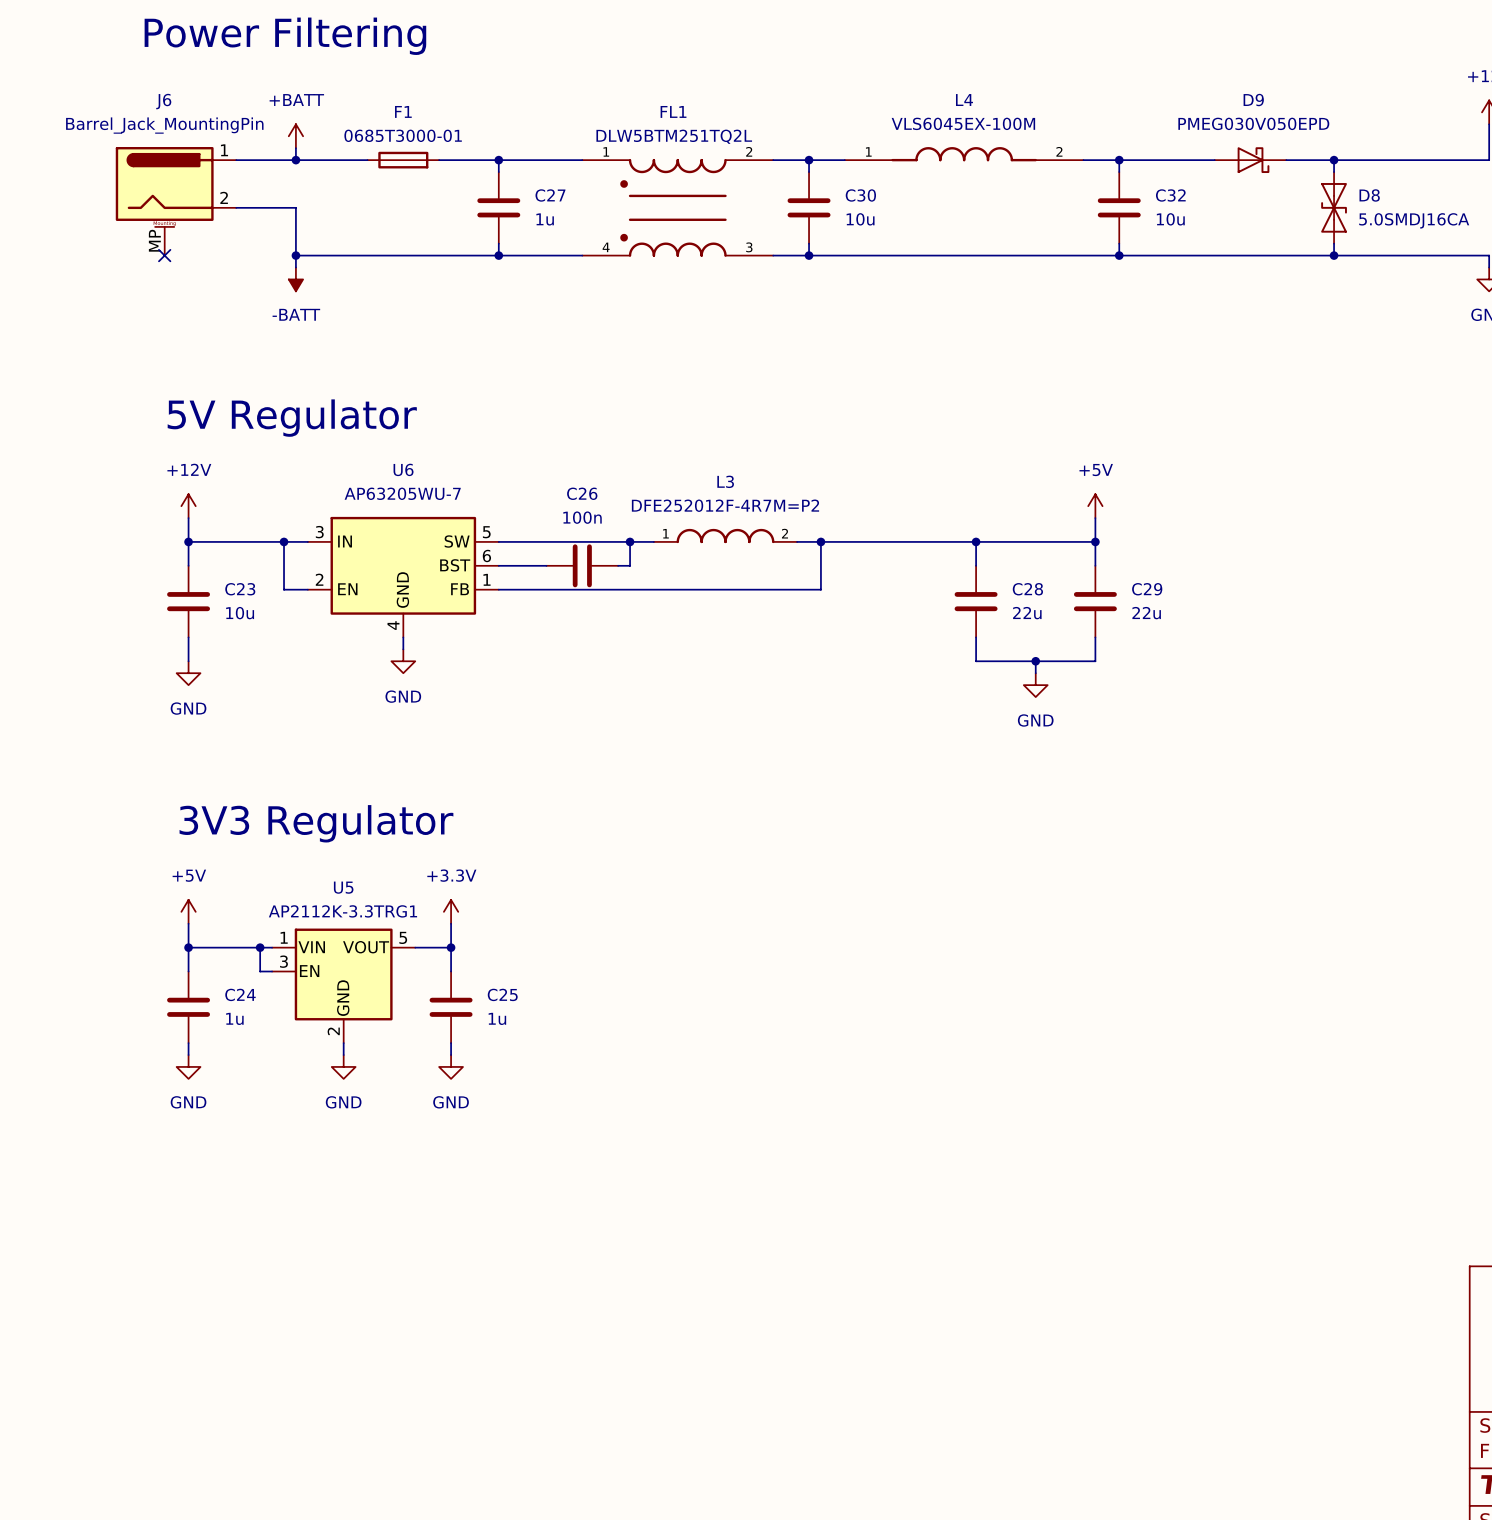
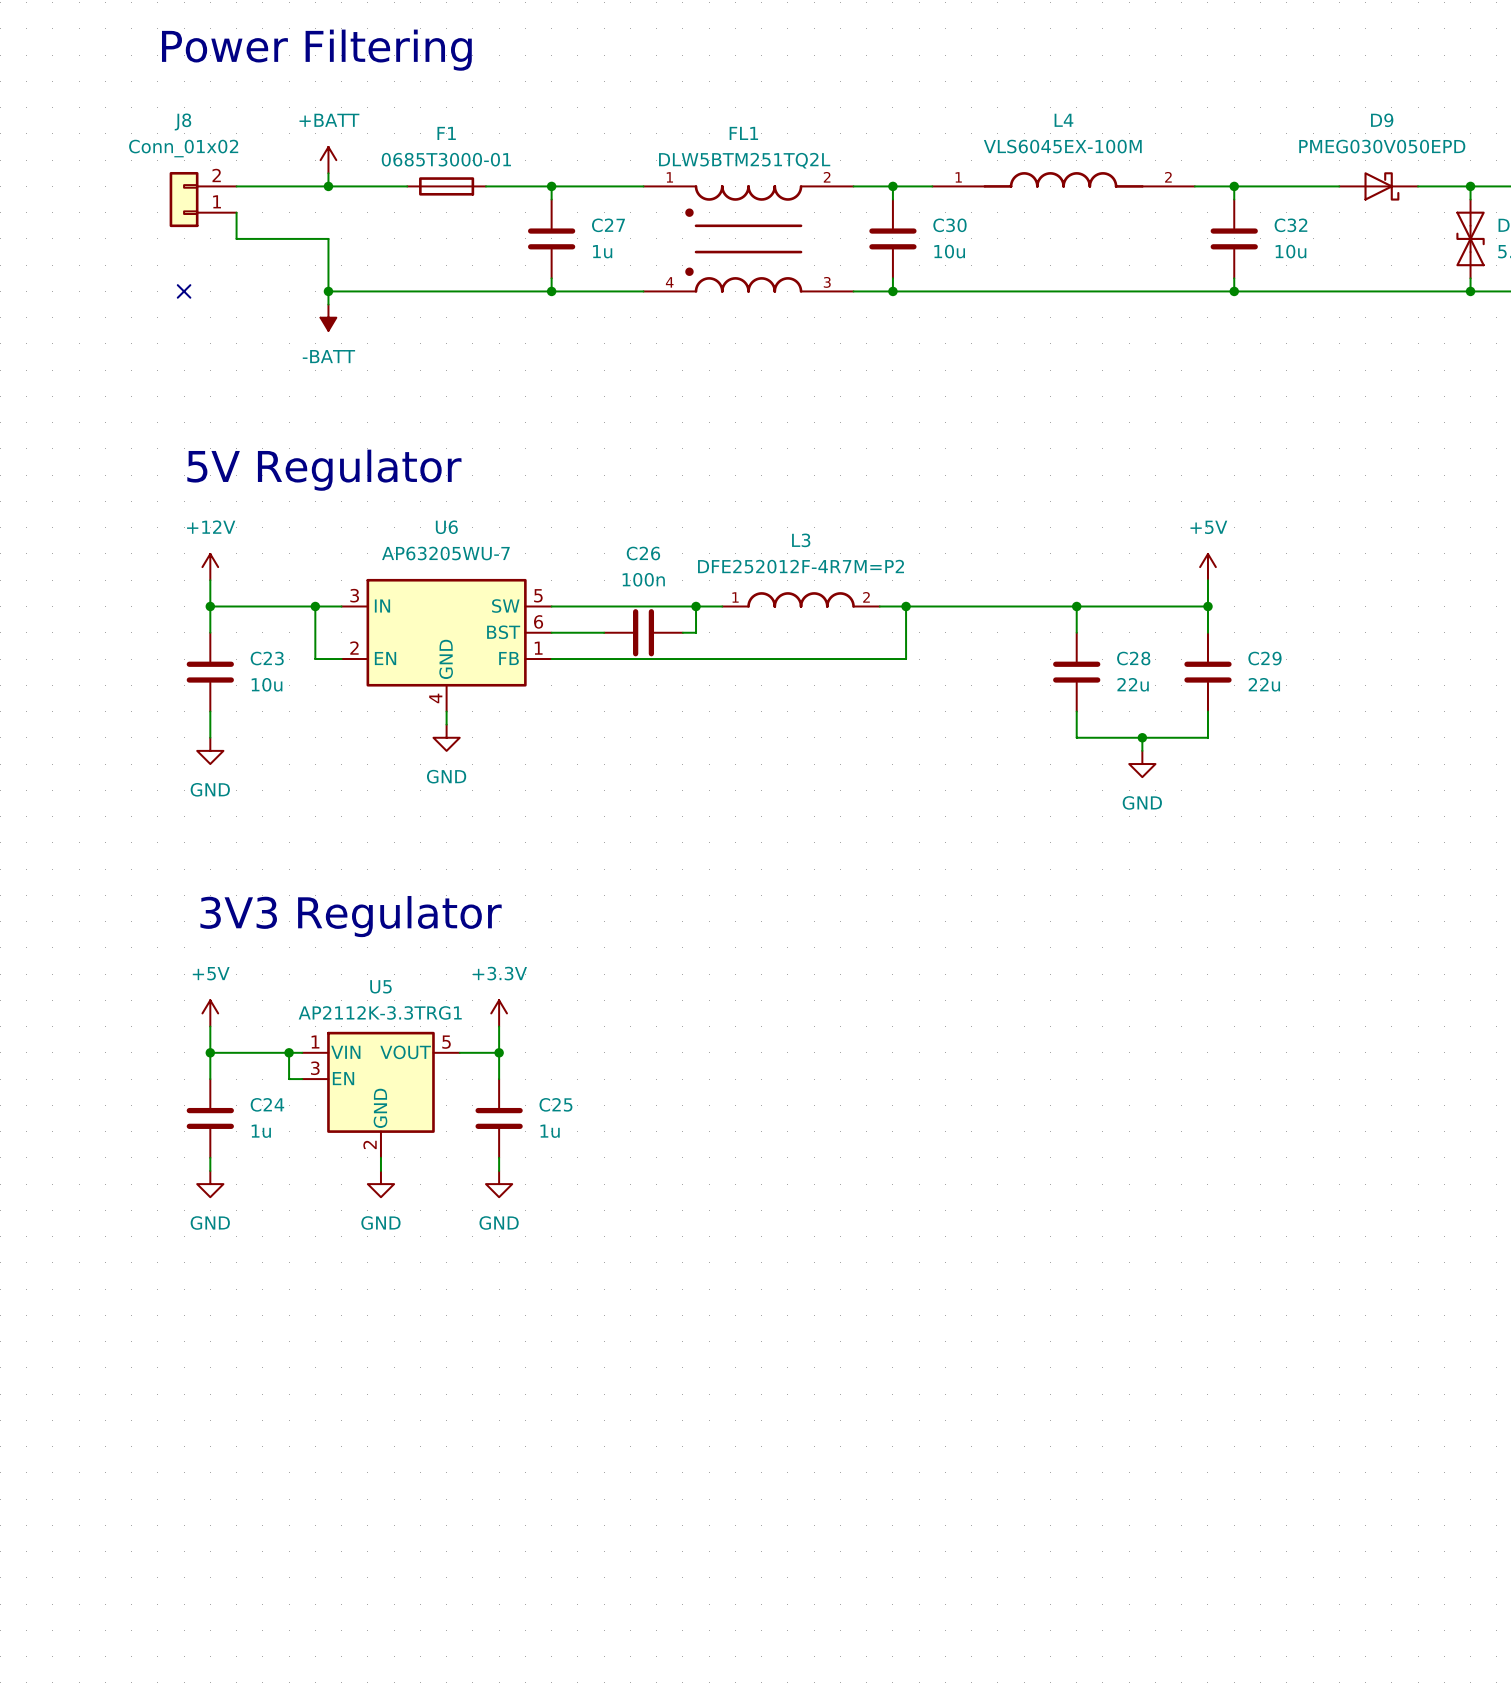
J8: none -> Conn_01x02 (203, 199)
J6: Barrel_Jack_MountingPin (176, 201) -> none

